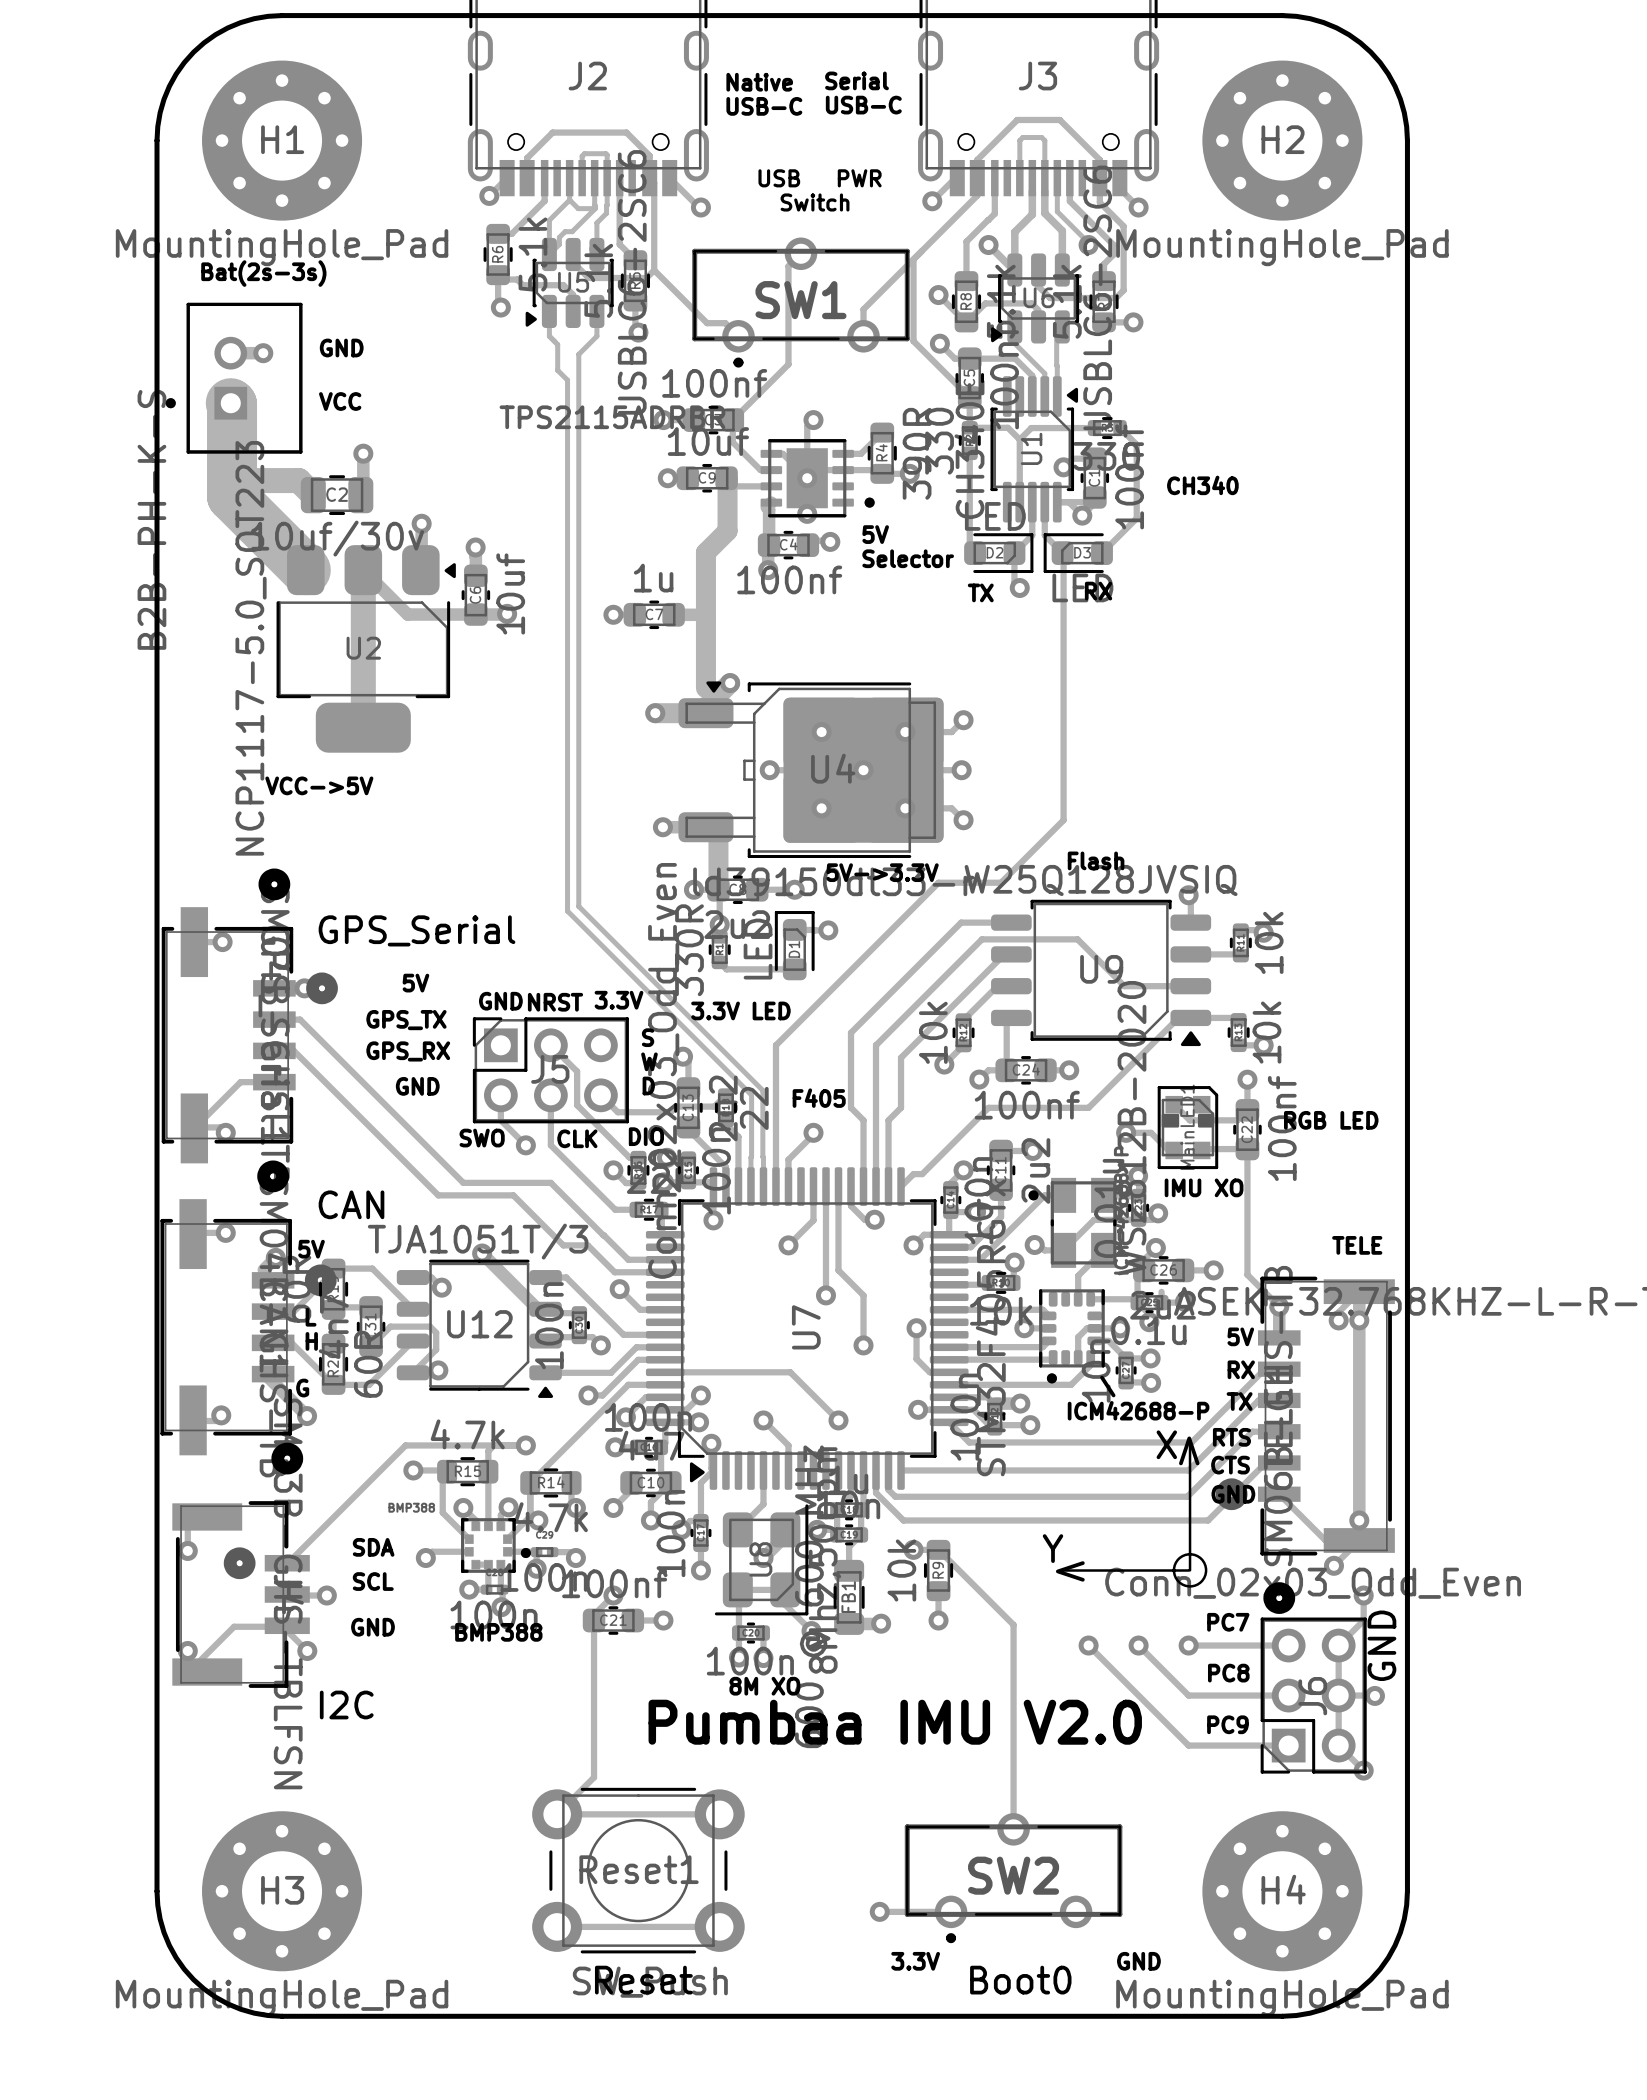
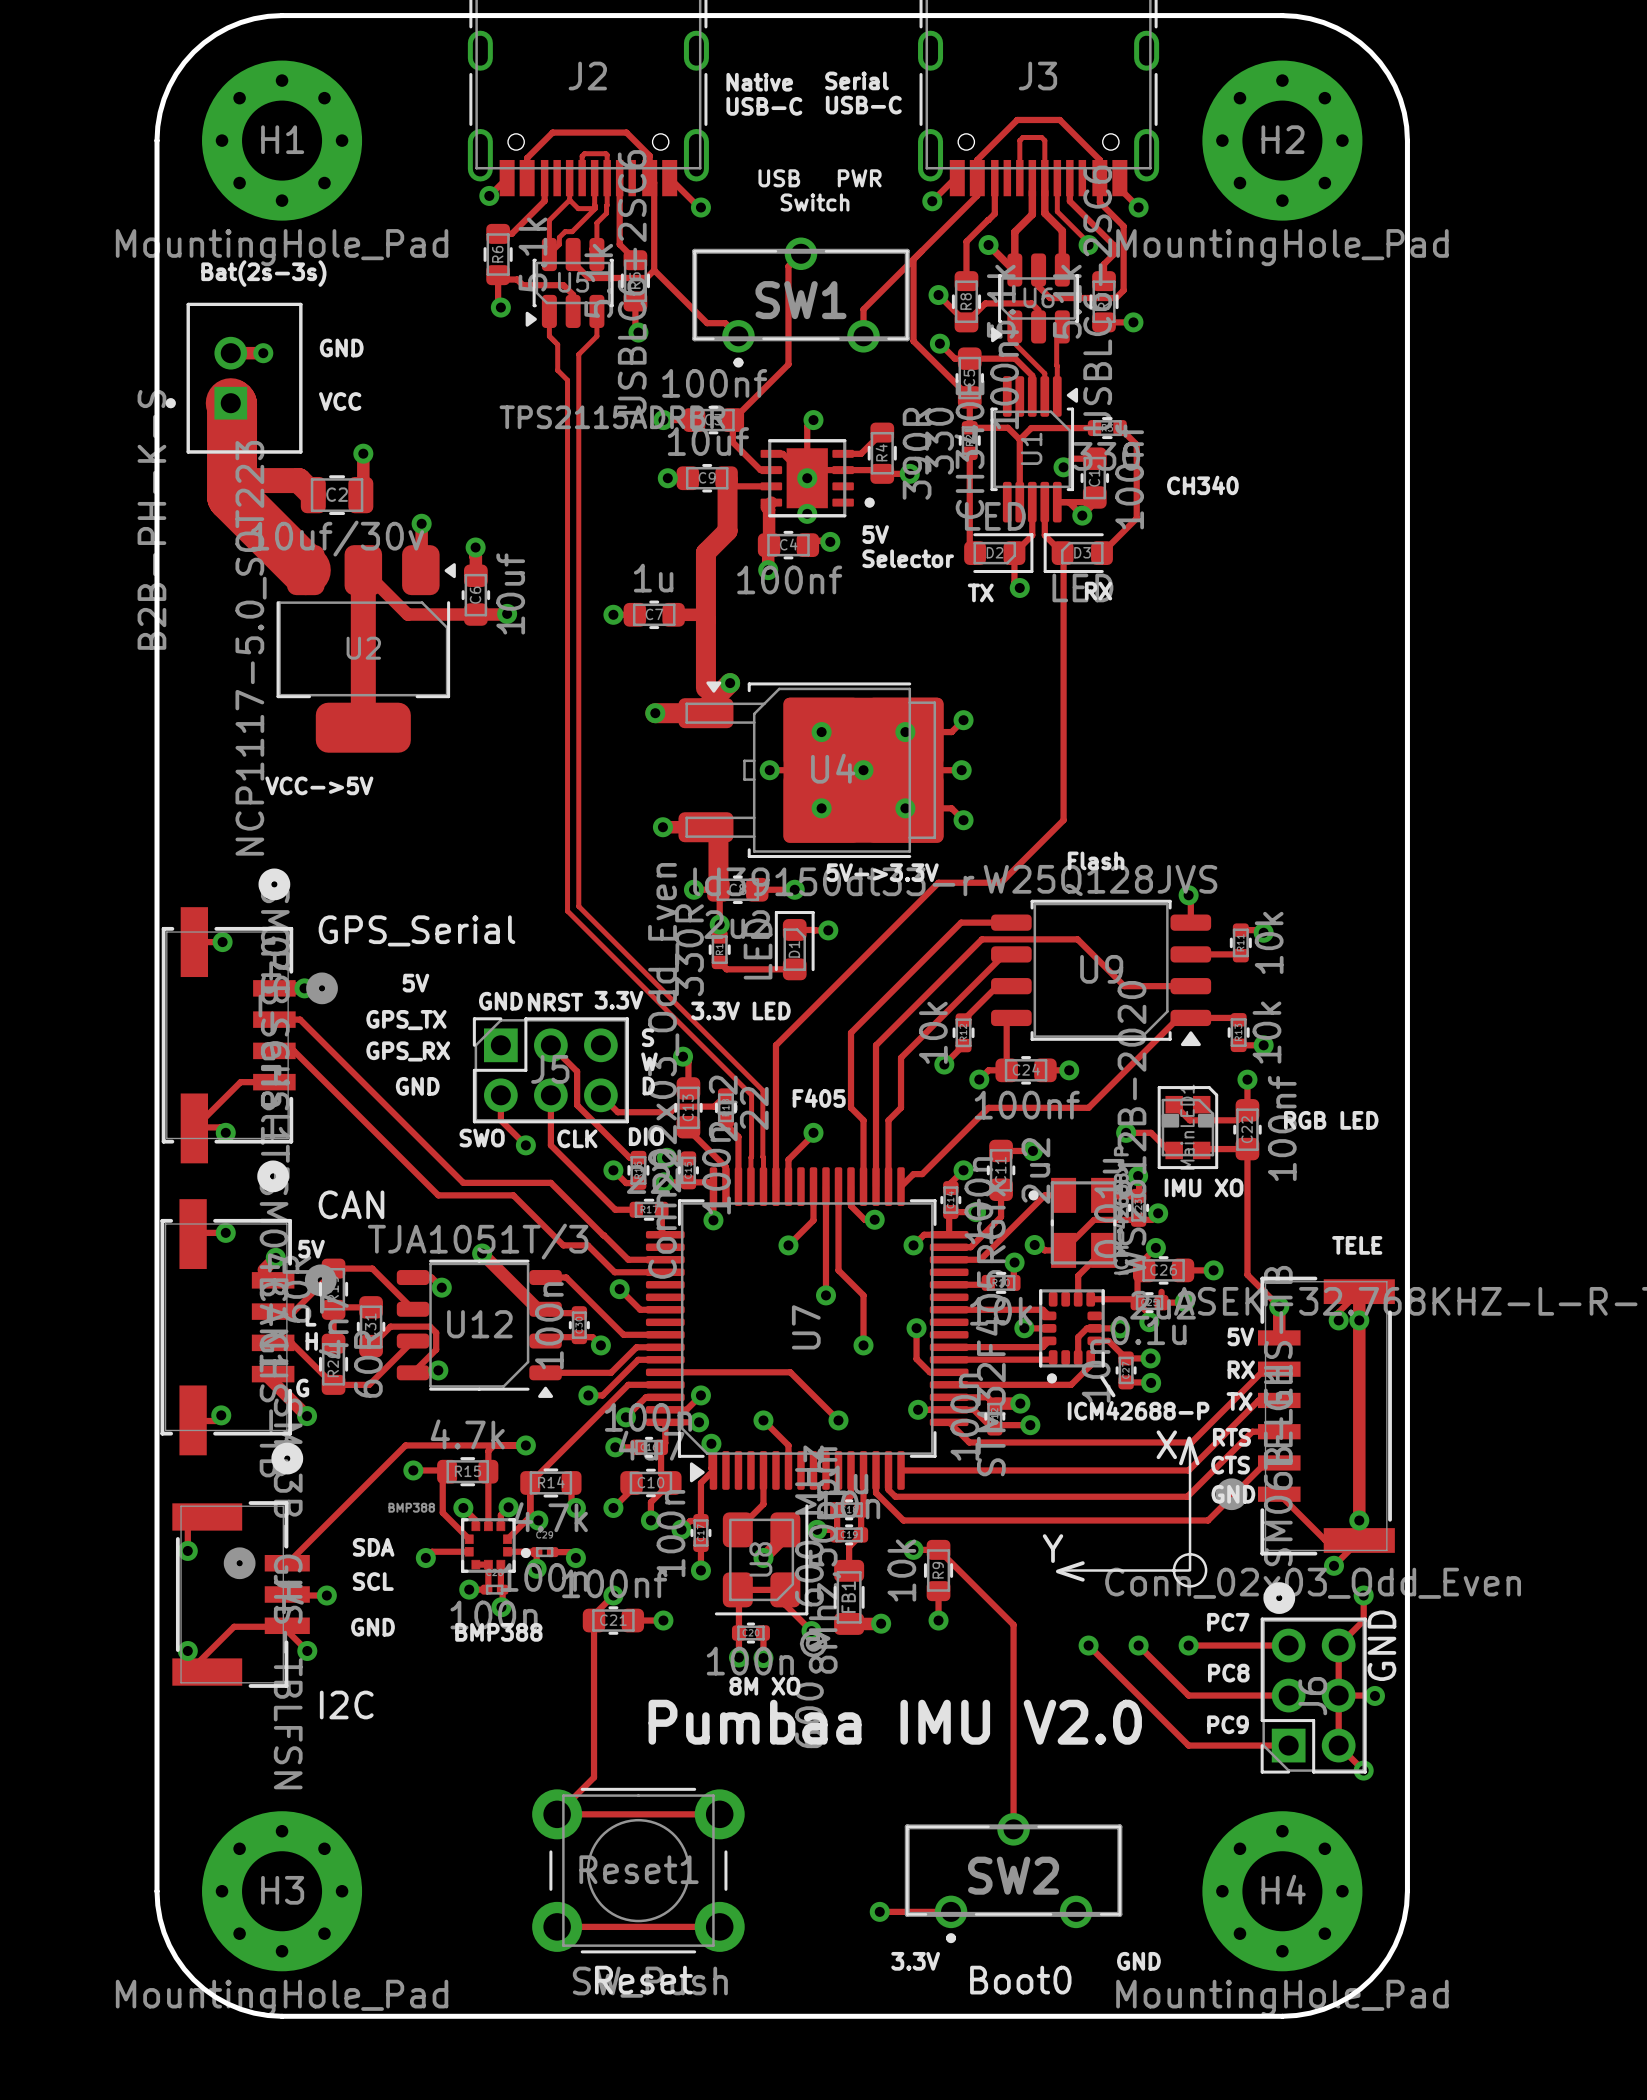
U9 value: W25Q128JVSIQ (1101, 880) -> W25Q128JVS (1100, 880)

